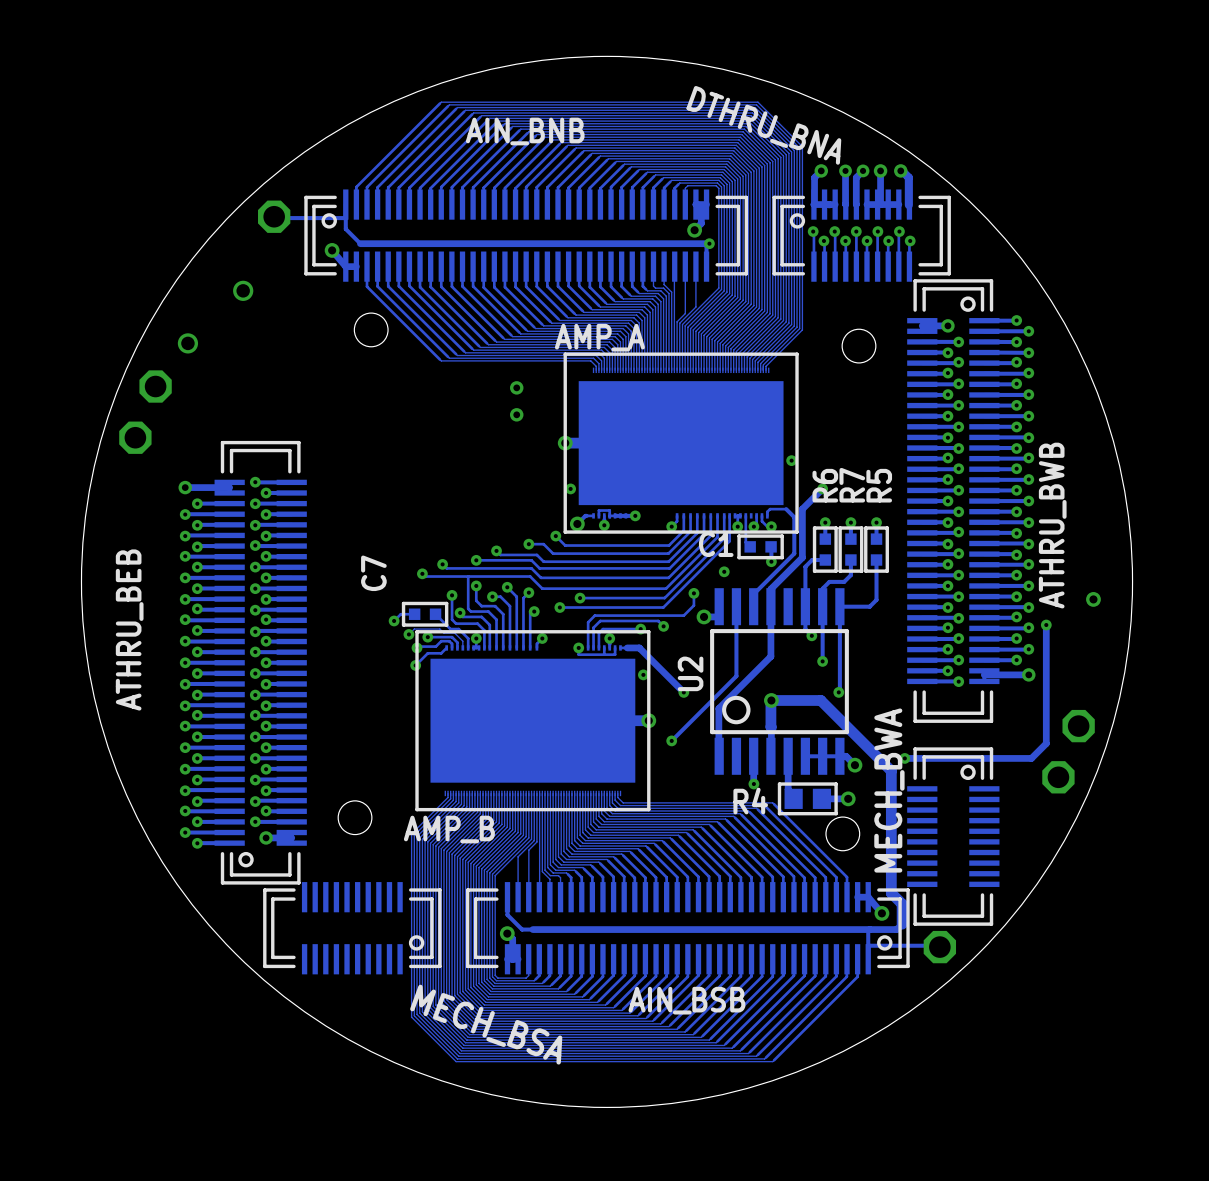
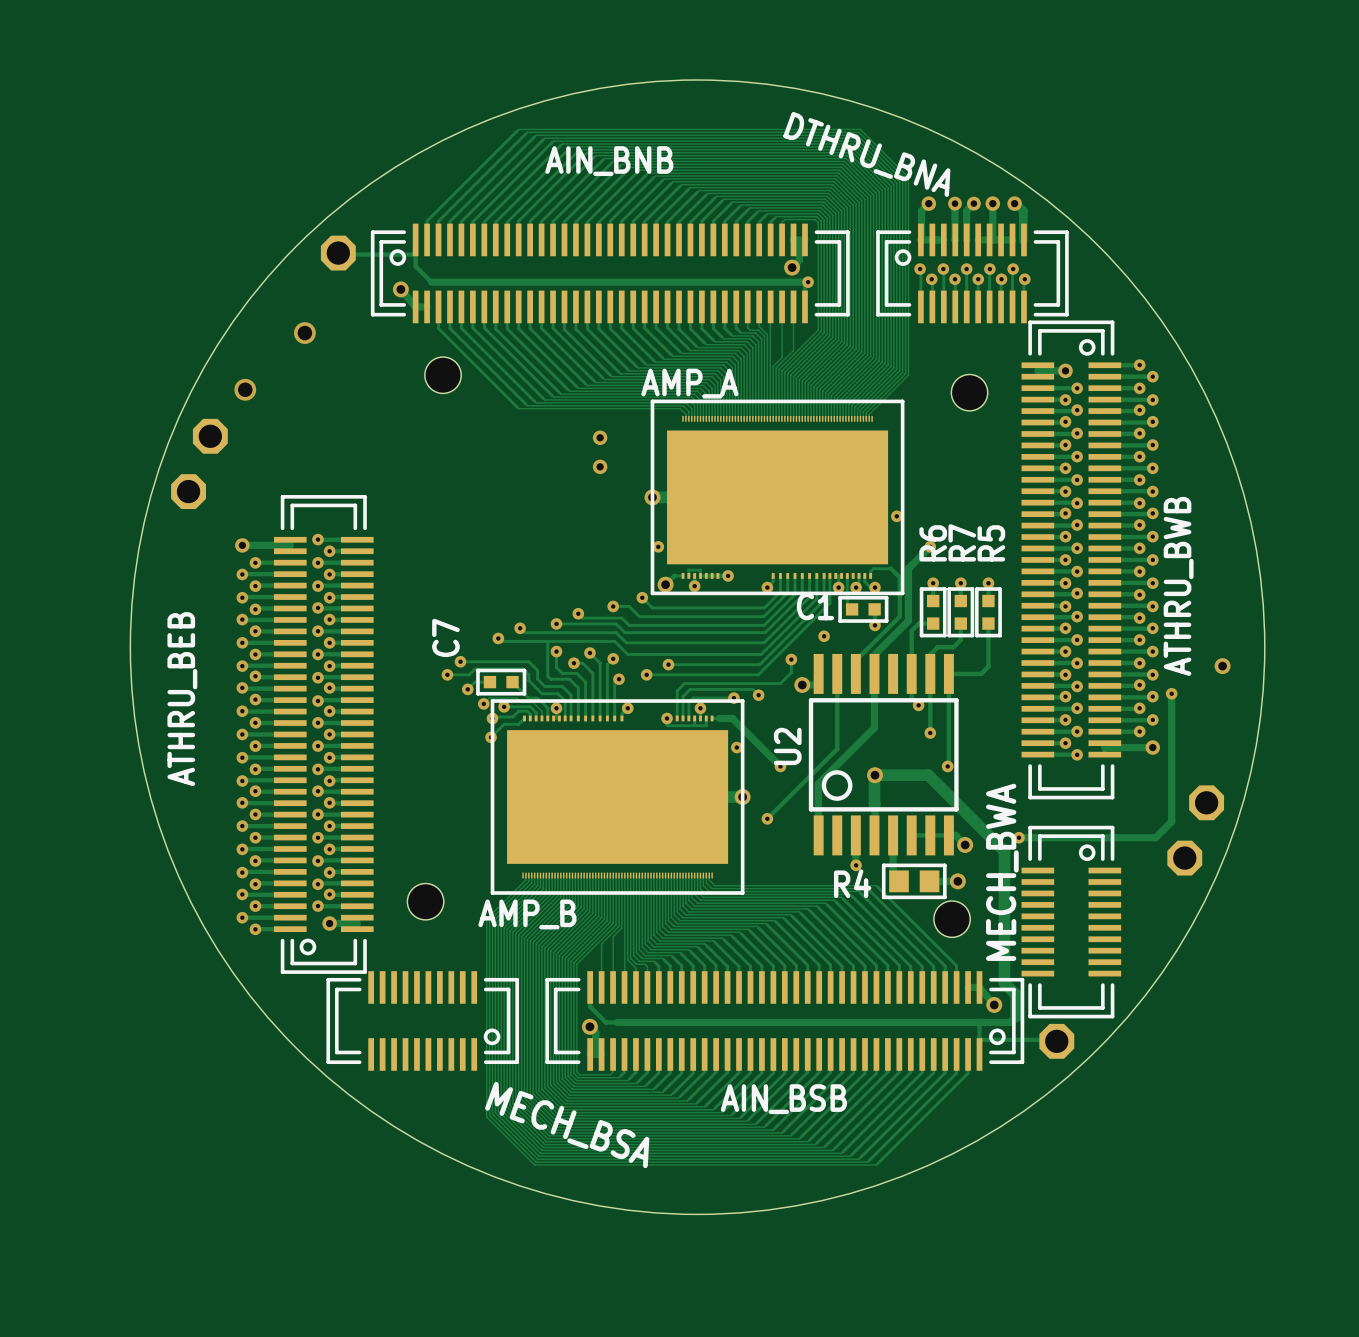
via: none -> (460, 661)
track: (452, 595) (452, 619) (456, 623) (477, 623) (484, 631) -> (447, 674) (469, 674) (475, 669) (523, 669) (528, 674) (528, 680) (541, 693) (557, 693) (565, 701)
via: (452, 595) -> none
via: none -> (447, 674)
track: (460, 612) (462, 616) (481, 616) (489, 626) -> (460, 661) (528, 661) (537, 670) (537, 679) (544, 686) (562, 686) (571, 695)
via: (460, 612) -> none

